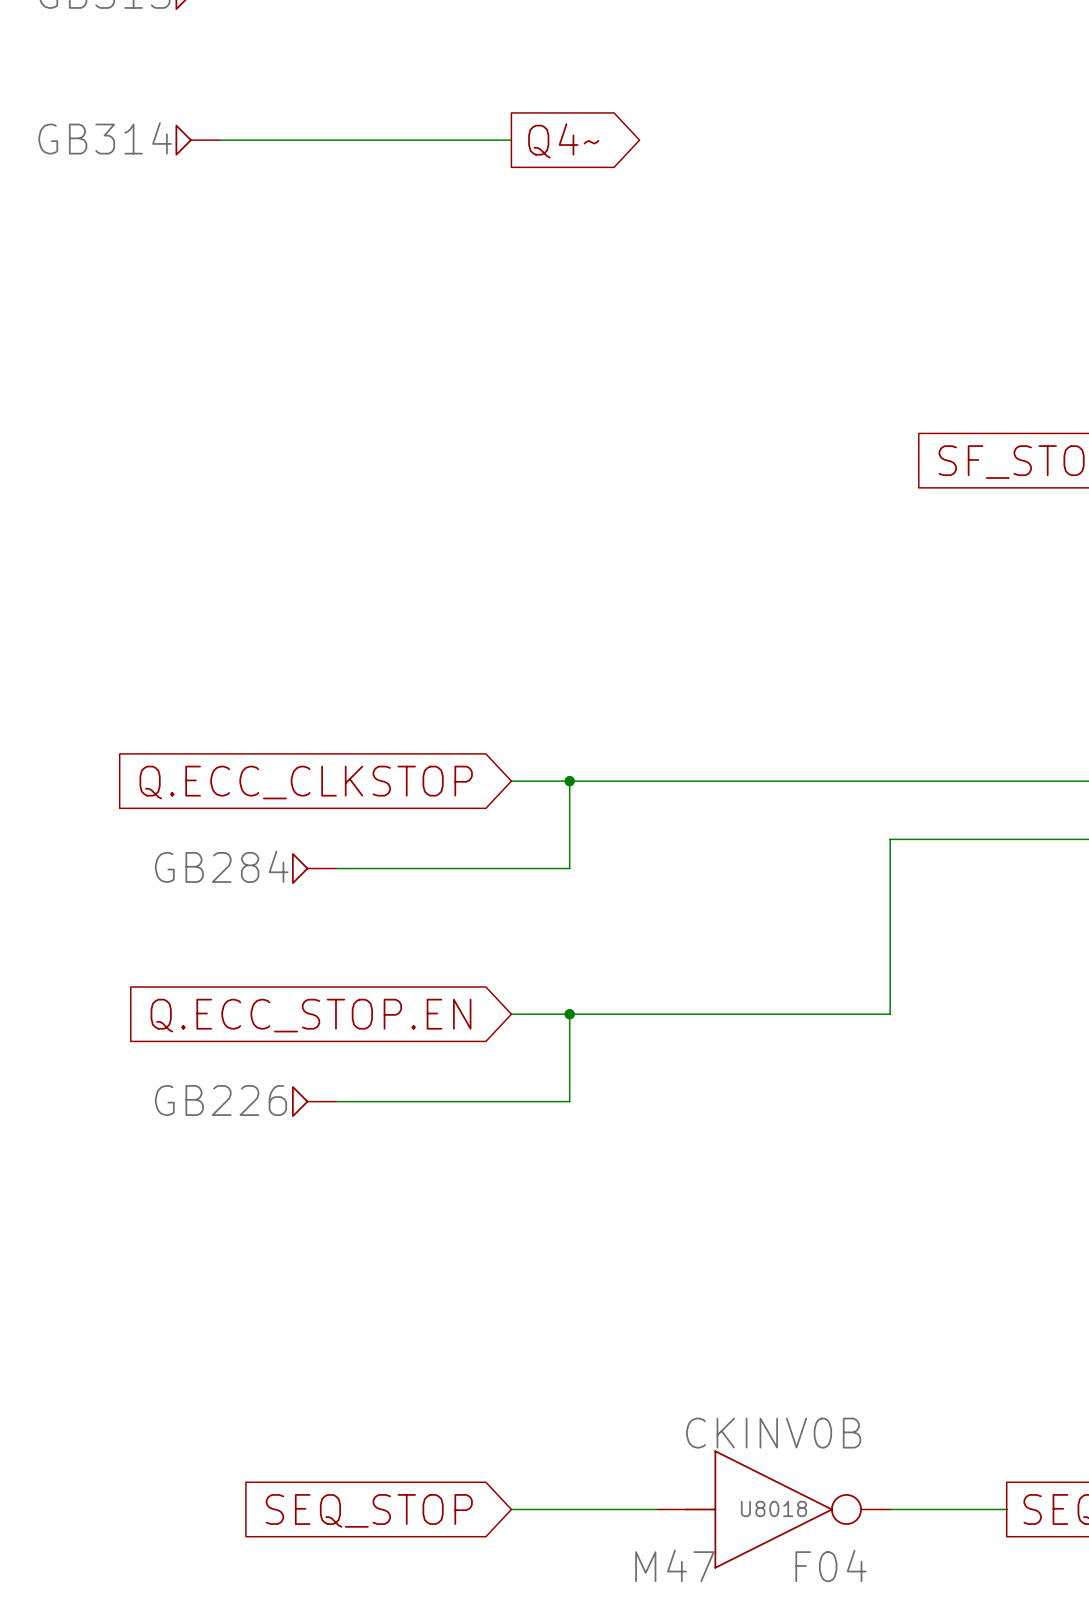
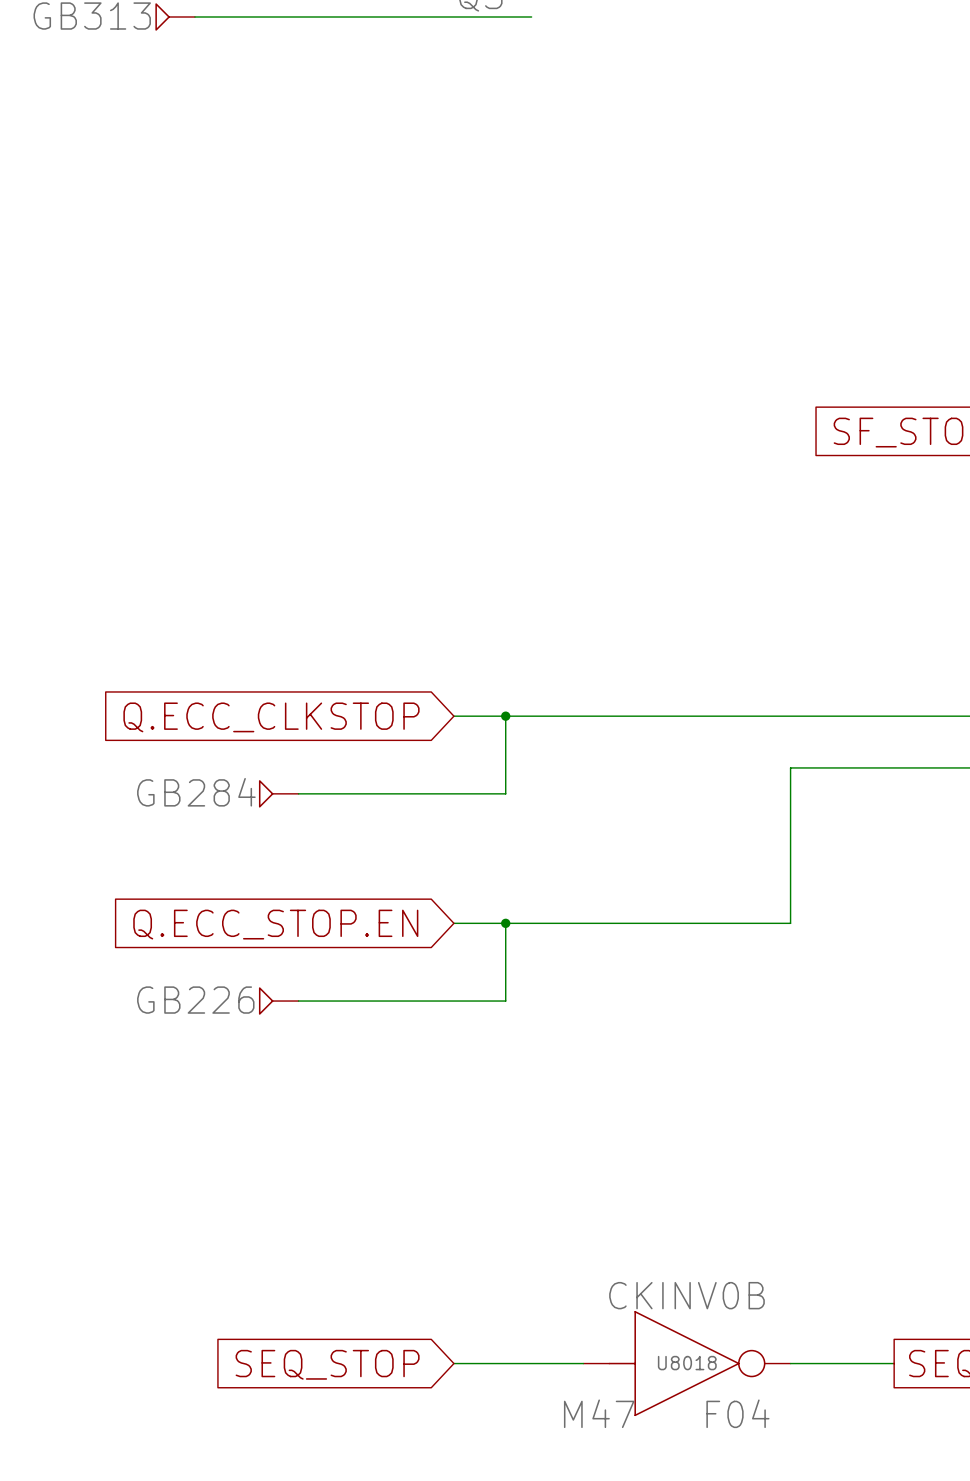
GB314: (197, 140) -> none
wire: (220, 140) (511, 140) -> none
global label: Q4~ (563, 140) -> none

